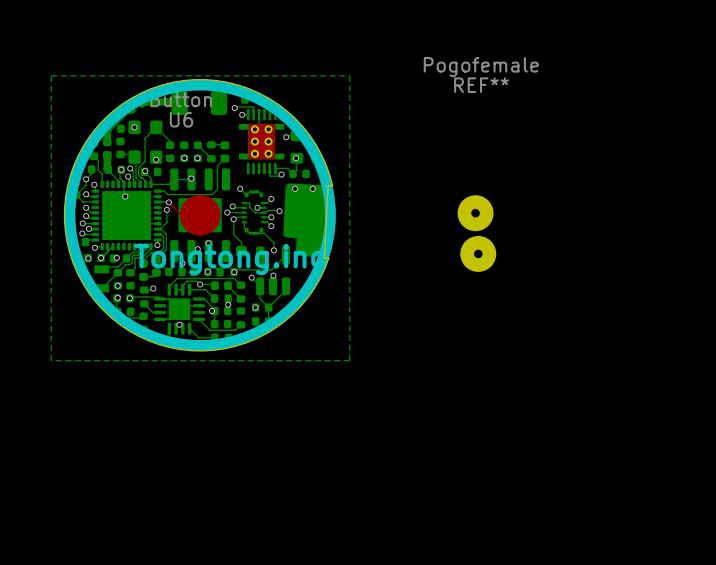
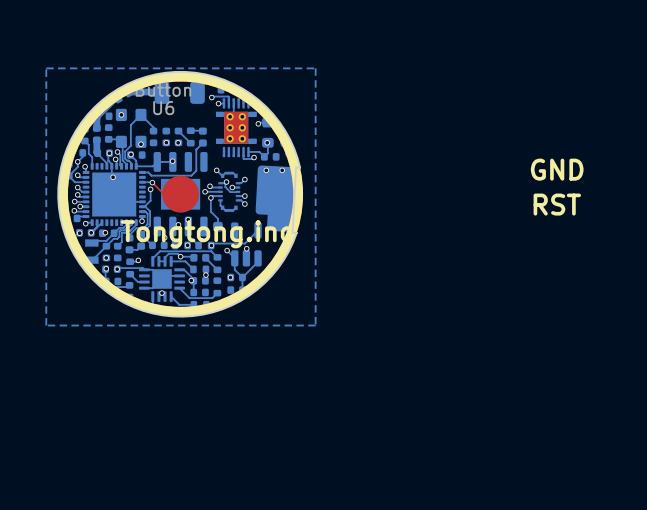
text: none -> GND (557, 169)
via: none -> (226, 182)
bottom track: (279, 211) (268, 210) (263, 212) -> none
via: (279, 211) -> none
part: (475, 213) -> none
text: none -> RST (557, 204)
bottom track: (258, 233) (264, 233) (273, 242) (273, 250) -> none
via: (273, 250) -> none
REF**: Pogofemale (478, 253) -> none

